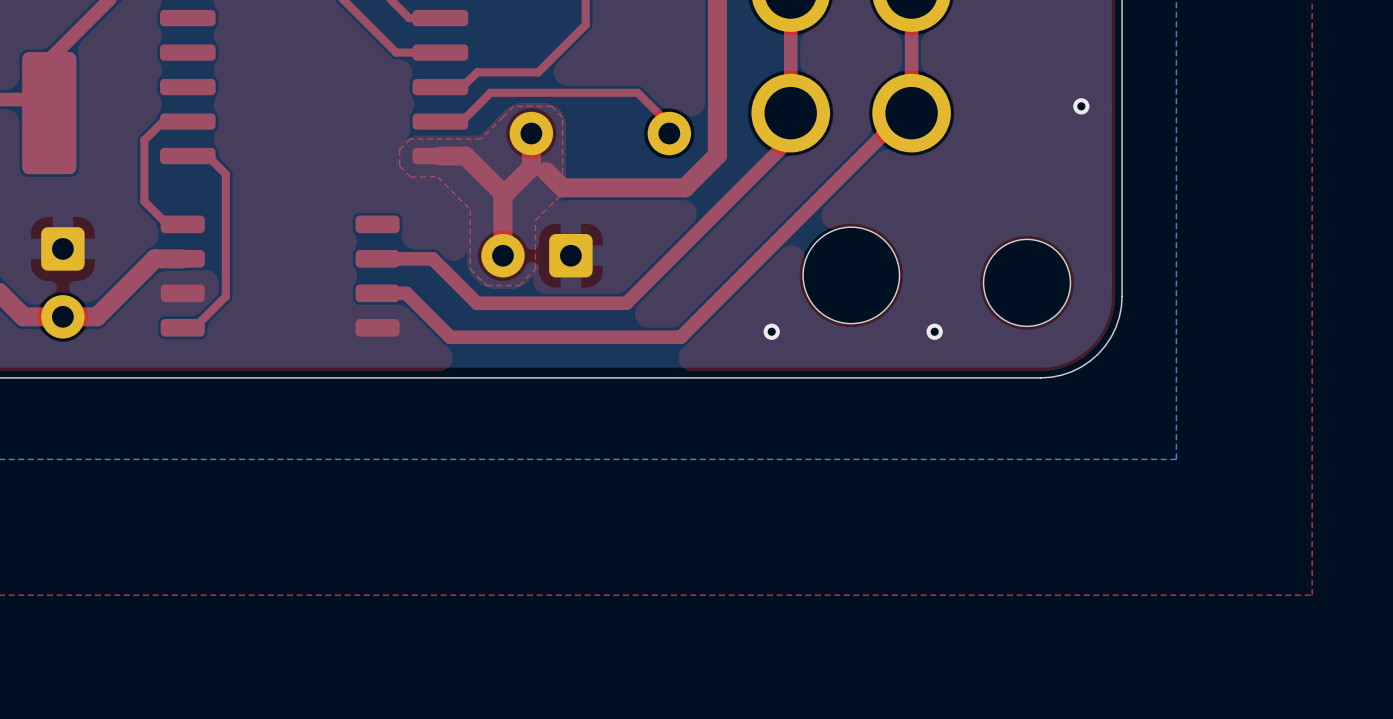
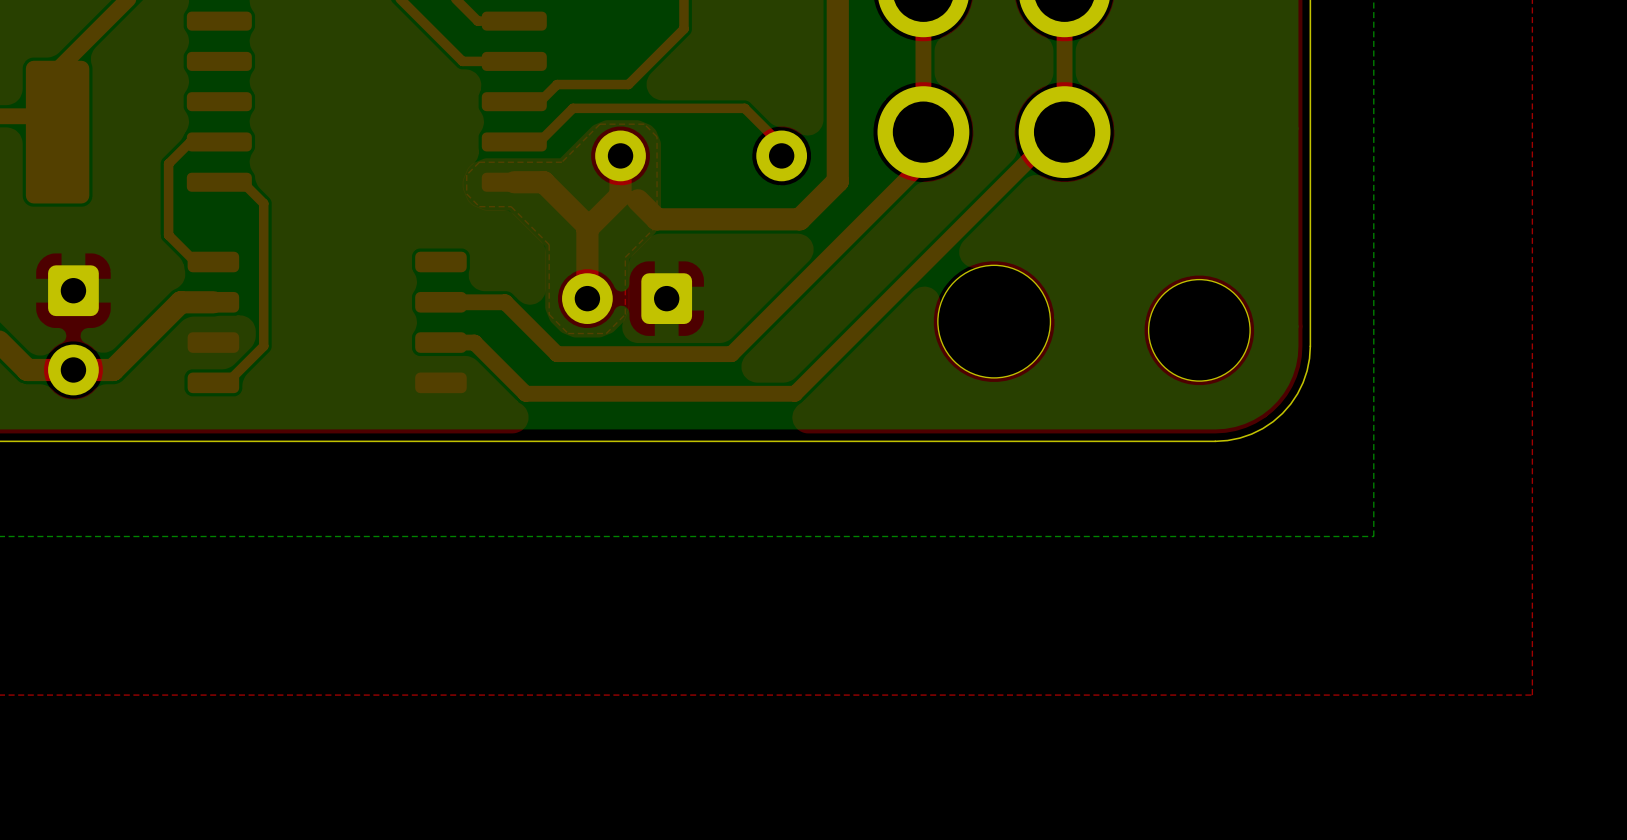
via: (1081, 106) -> none
via: (771, 331) -> none
via: (934, 331) -> none

